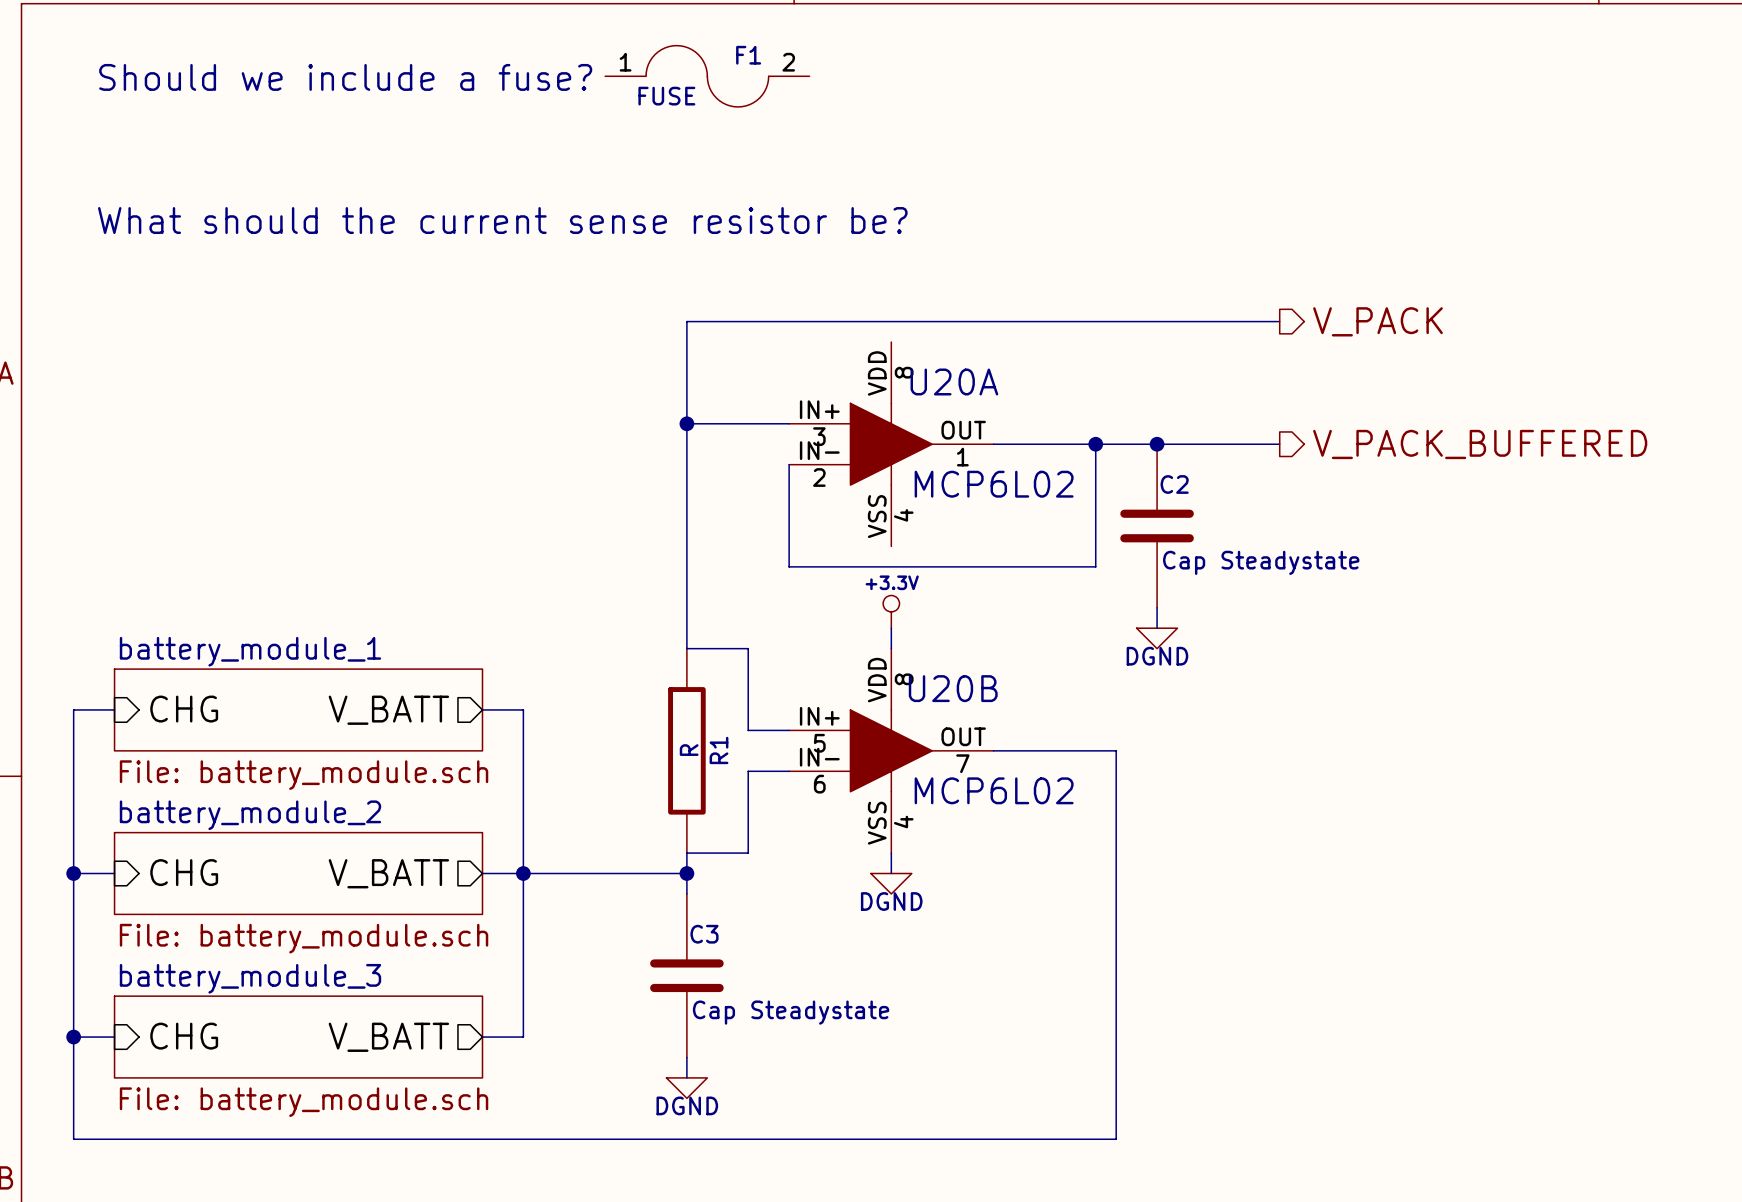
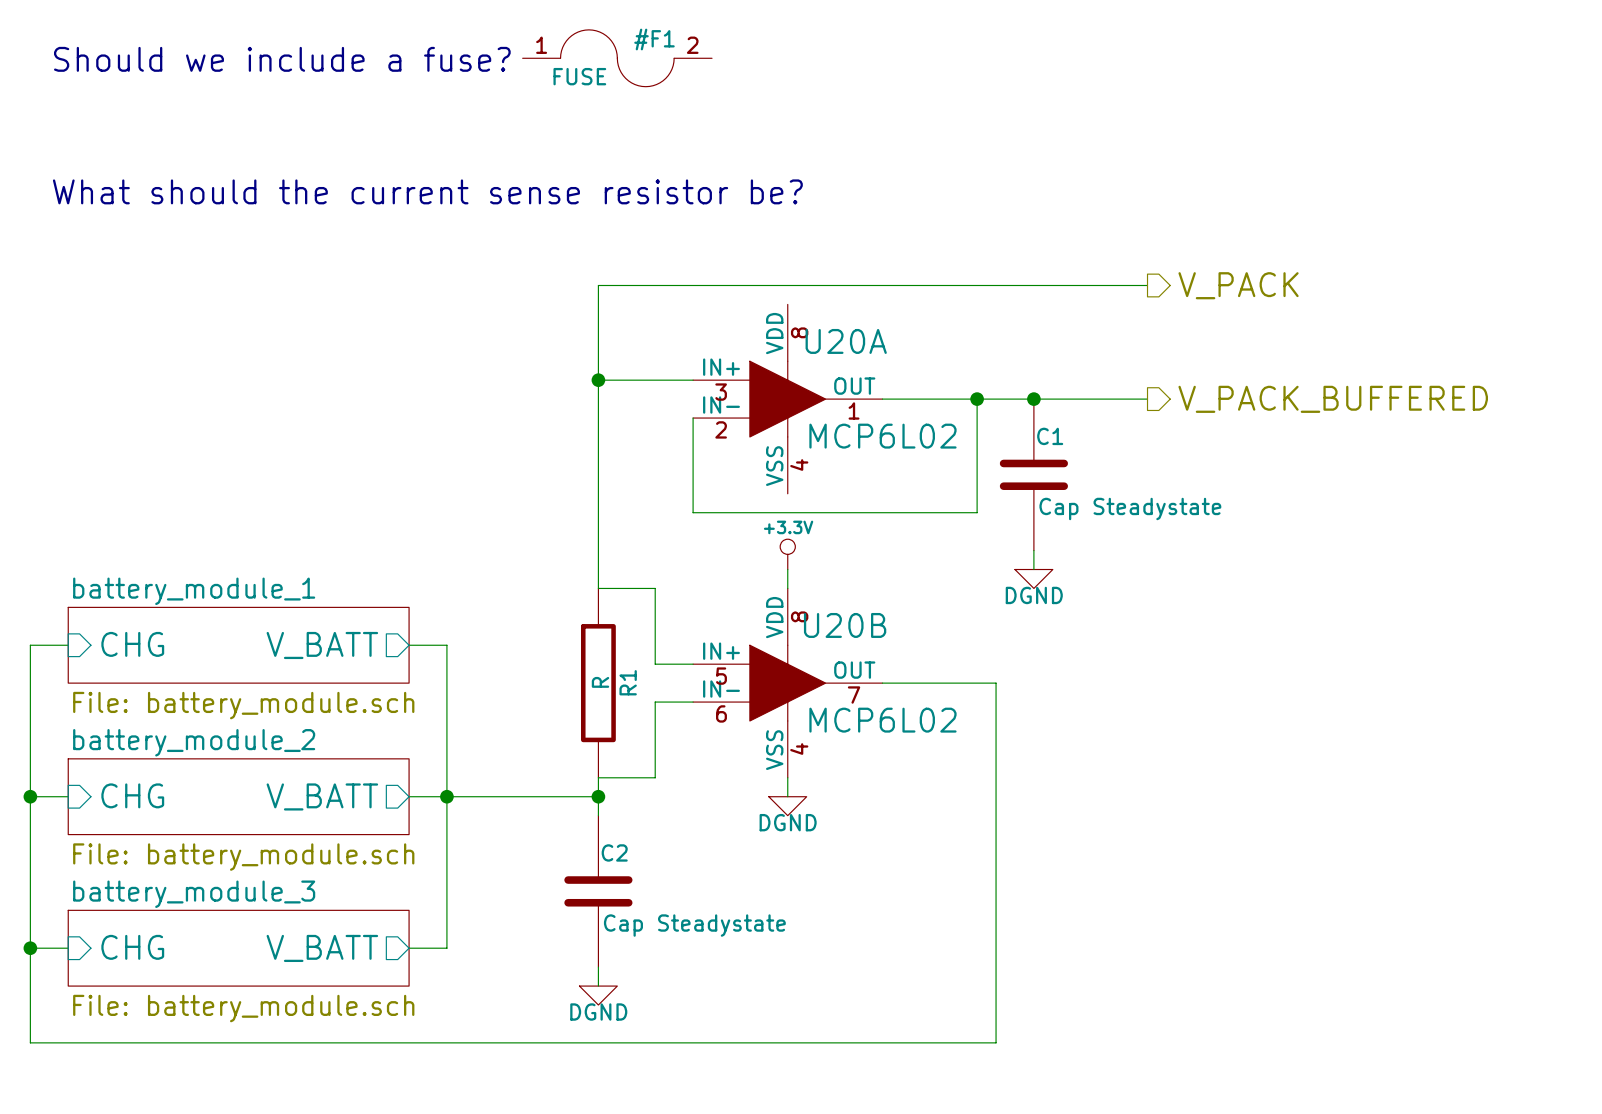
F1: FUSE (707, 76) -> none
#F1: none -> FUSE (617, 58)
C2 name: C2 (1174, 484) -> C1 (1050, 436)
C3 name: C3 (704, 934) -> C2 (614, 852)

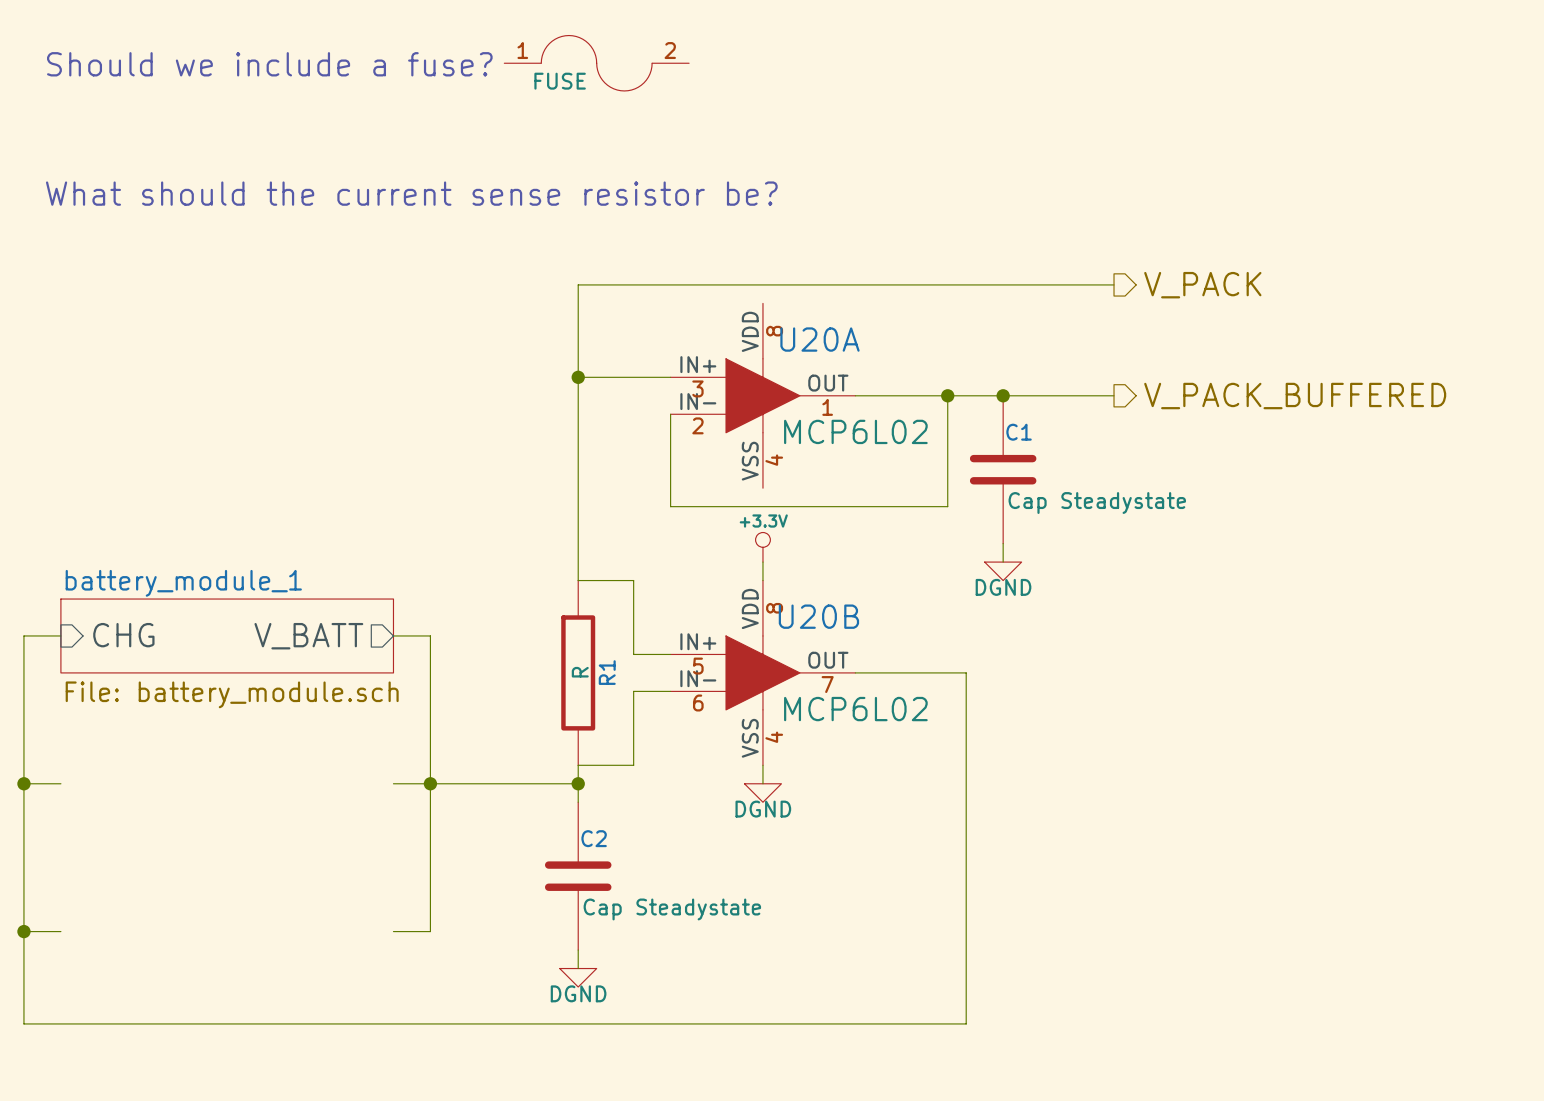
#F1 name: #F1 (654, 39) -> none
sheet pin: CHG (132, 795) -> none
sheet battery_module_2: File: battery_module.sch (238, 796) -> none
sheet pin: V_BATT (322, 796) -> none
sheet pin: CHG (132, 947) -> none
sheet battery_module_3: File: battery_module.sch (238, 948) -> none
sheet pin: V_BATT (322, 948) -> none

